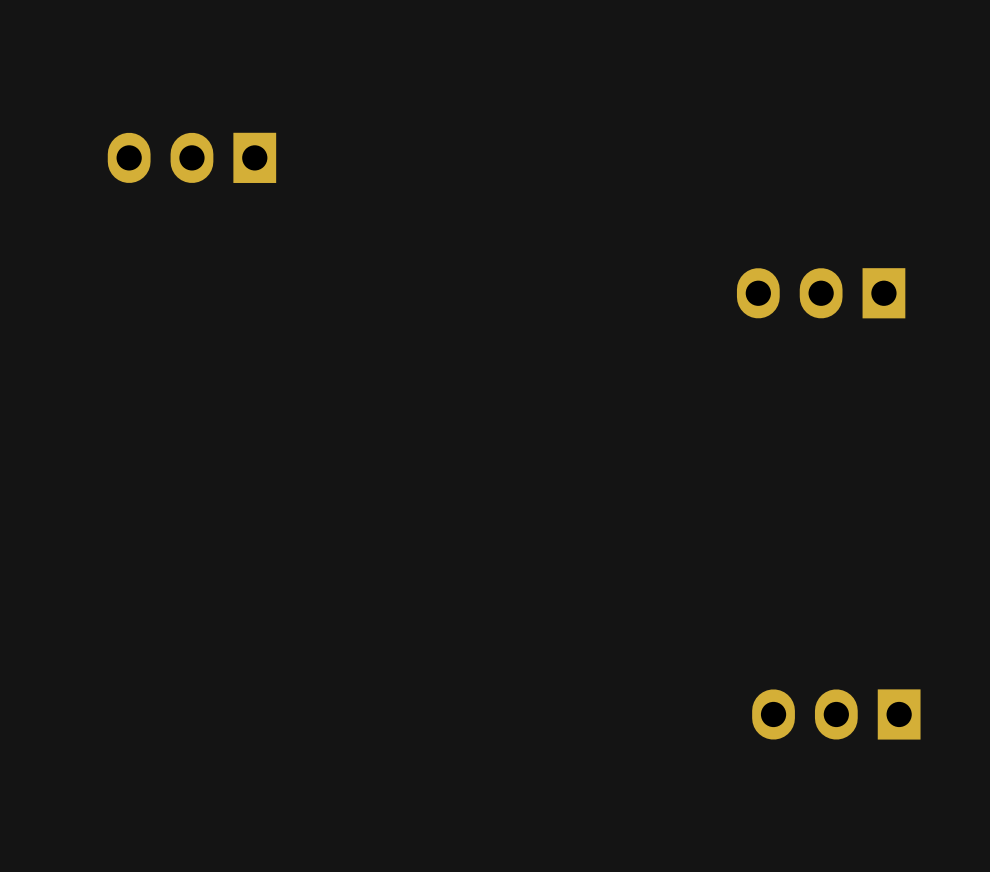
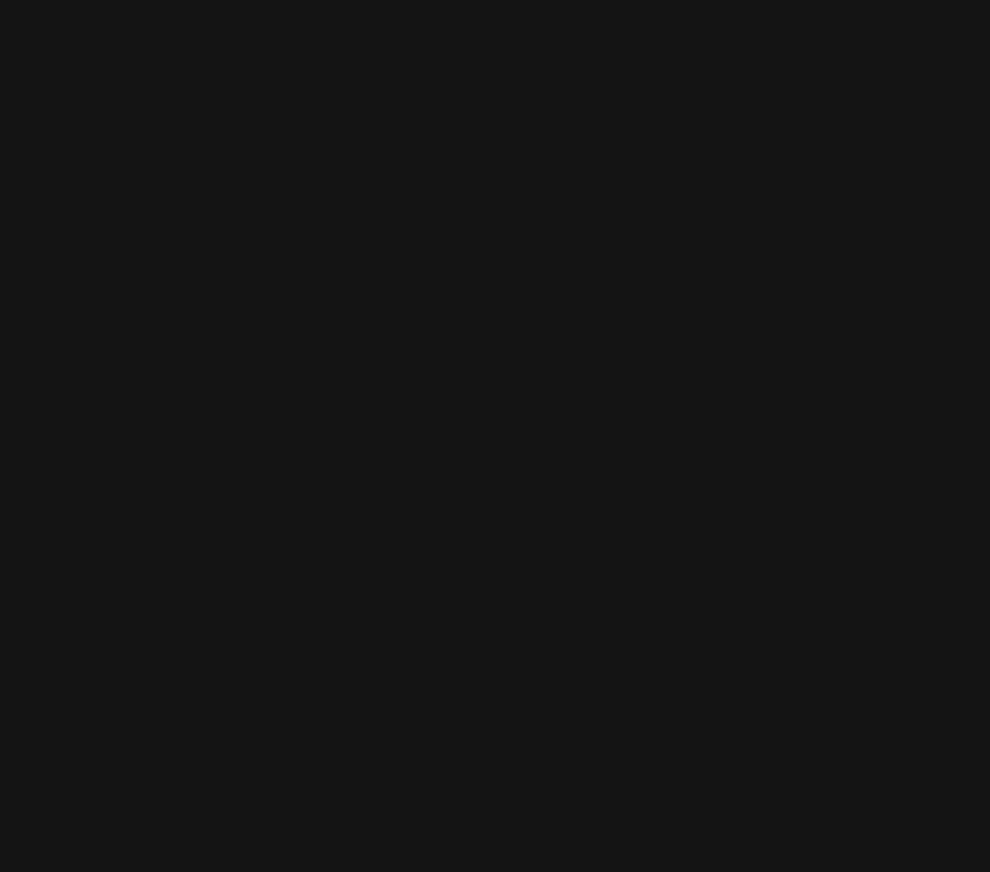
part: (191, 157) -> none
part: (821, 293) -> none
part: (836, 714) -> none

